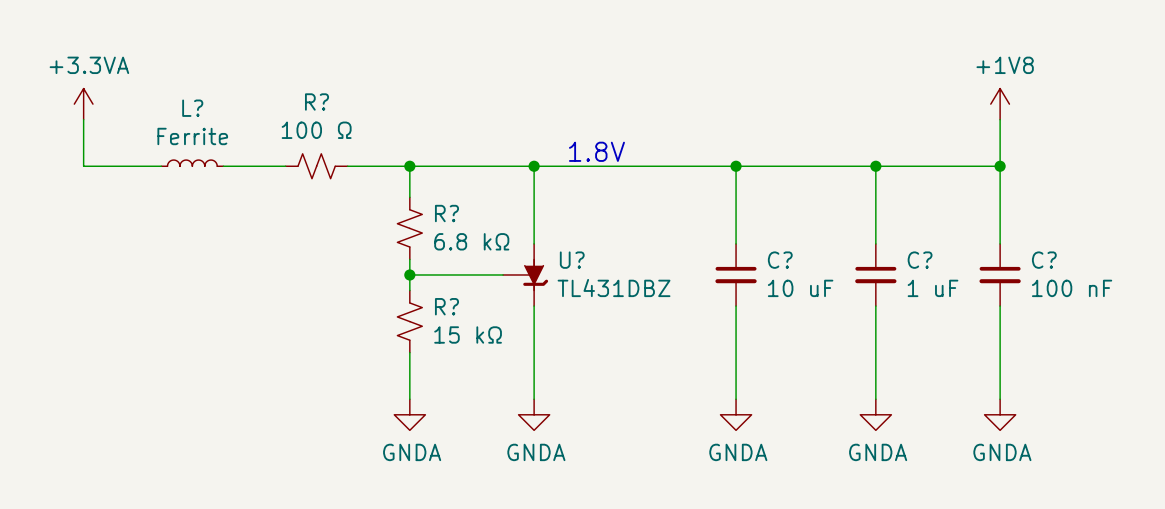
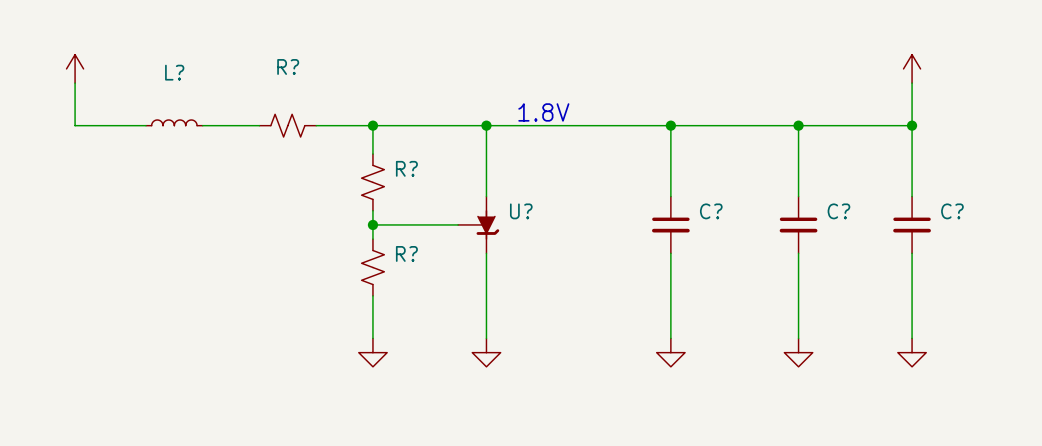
power symbol text: +3.3VA (89, 65) -> none
power symbol text: +1V8 (1005, 65) -> none
R? value: 100 Ω (316, 130) -> none
L? value: Ferrite (192, 136) -> none
R? value: 6.8 kΩ (471, 241) -> none
U? value: TL431DBZ (614, 288) -> none
C? value: 10 uF (800, 288) -> none
C? value: 1 uF (933, 288) -> none
C? value: 100 nF (1072, 288) -> none
R? value: 15 kΩ (468, 334) -> none
power symbol text: GNDA (412, 452) -> none
power symbol text: GNDA (536, 452) -> none
power symbol text: GNDA (738, 452) -> none
power symbol text: GNDA (878, 452) -> none
power symbol text: GNDA (1002, 452) -> none

